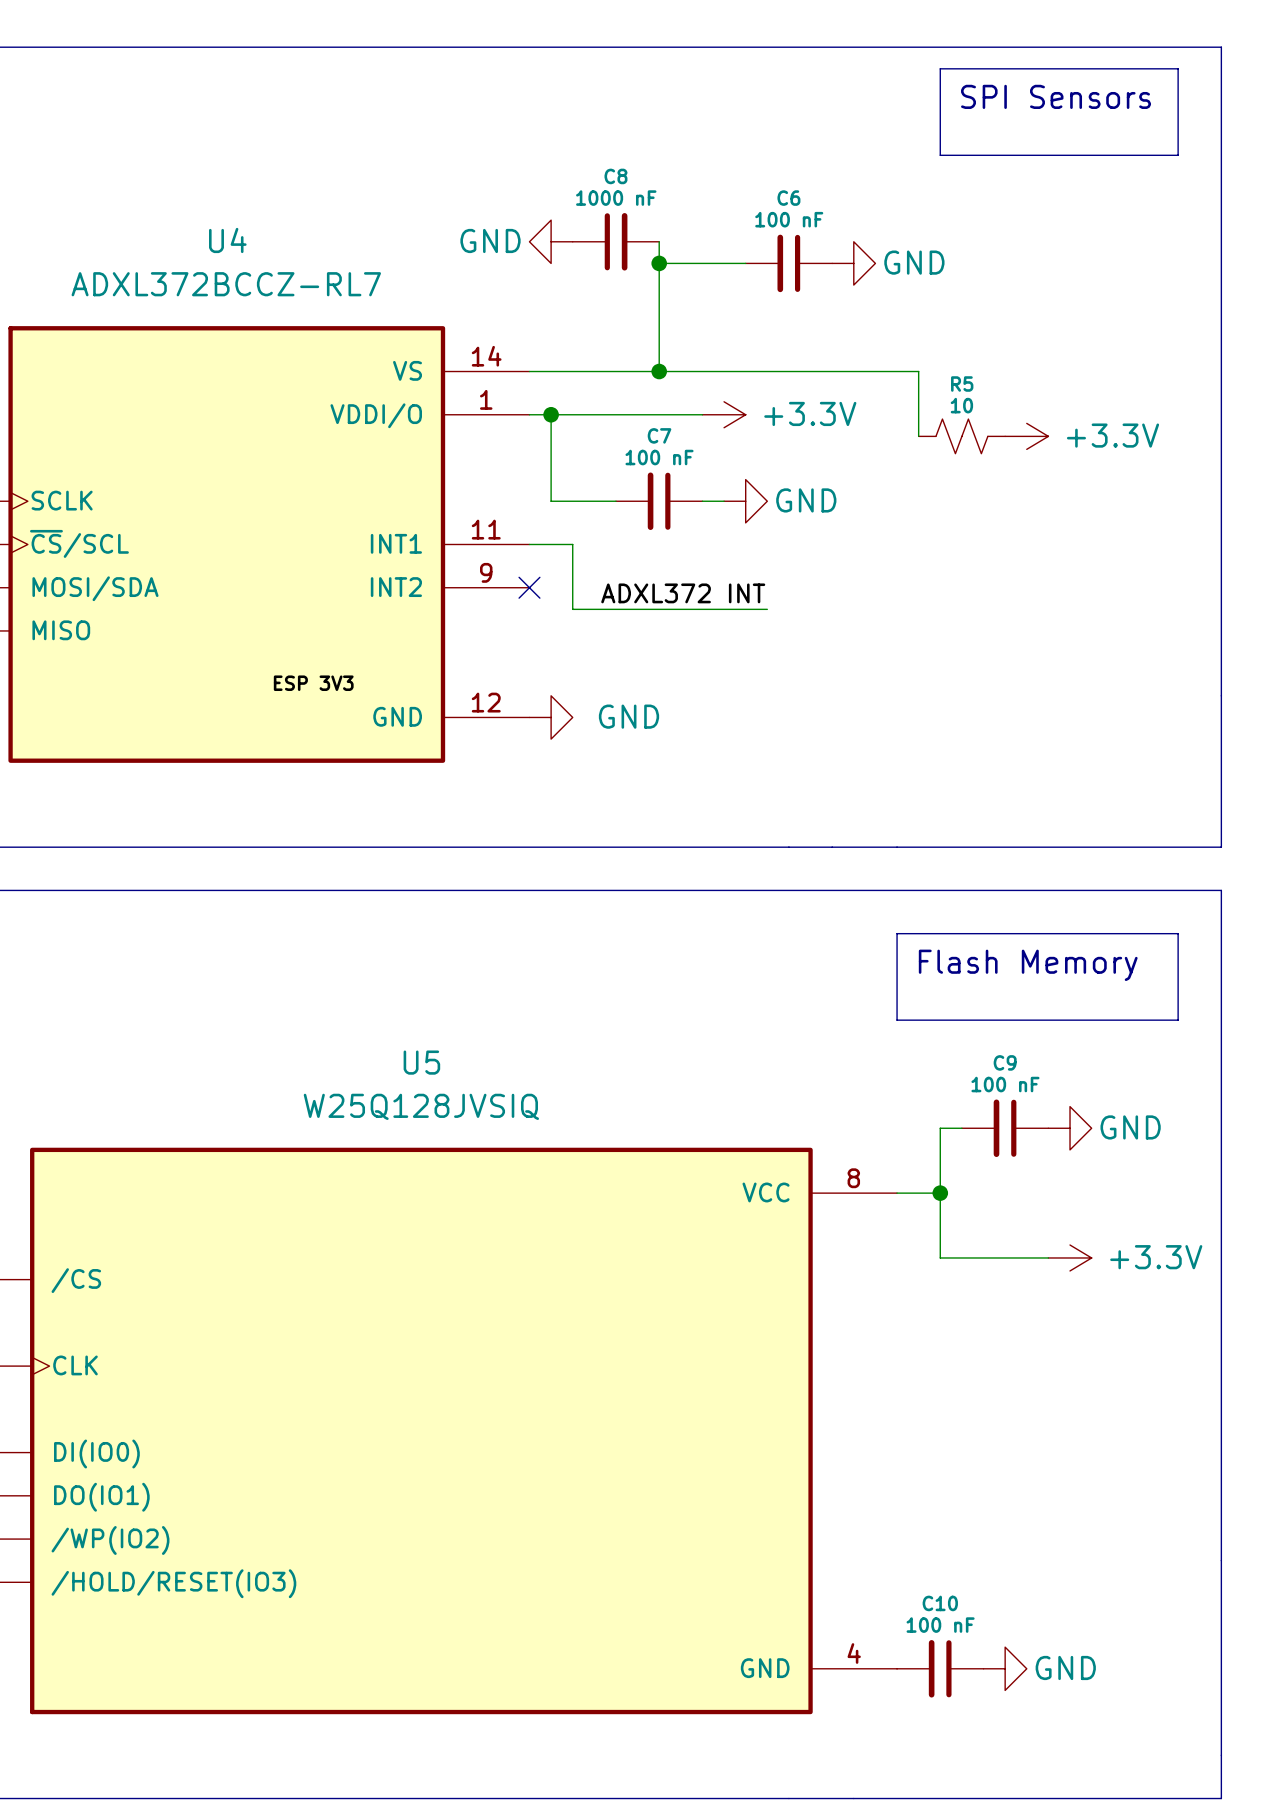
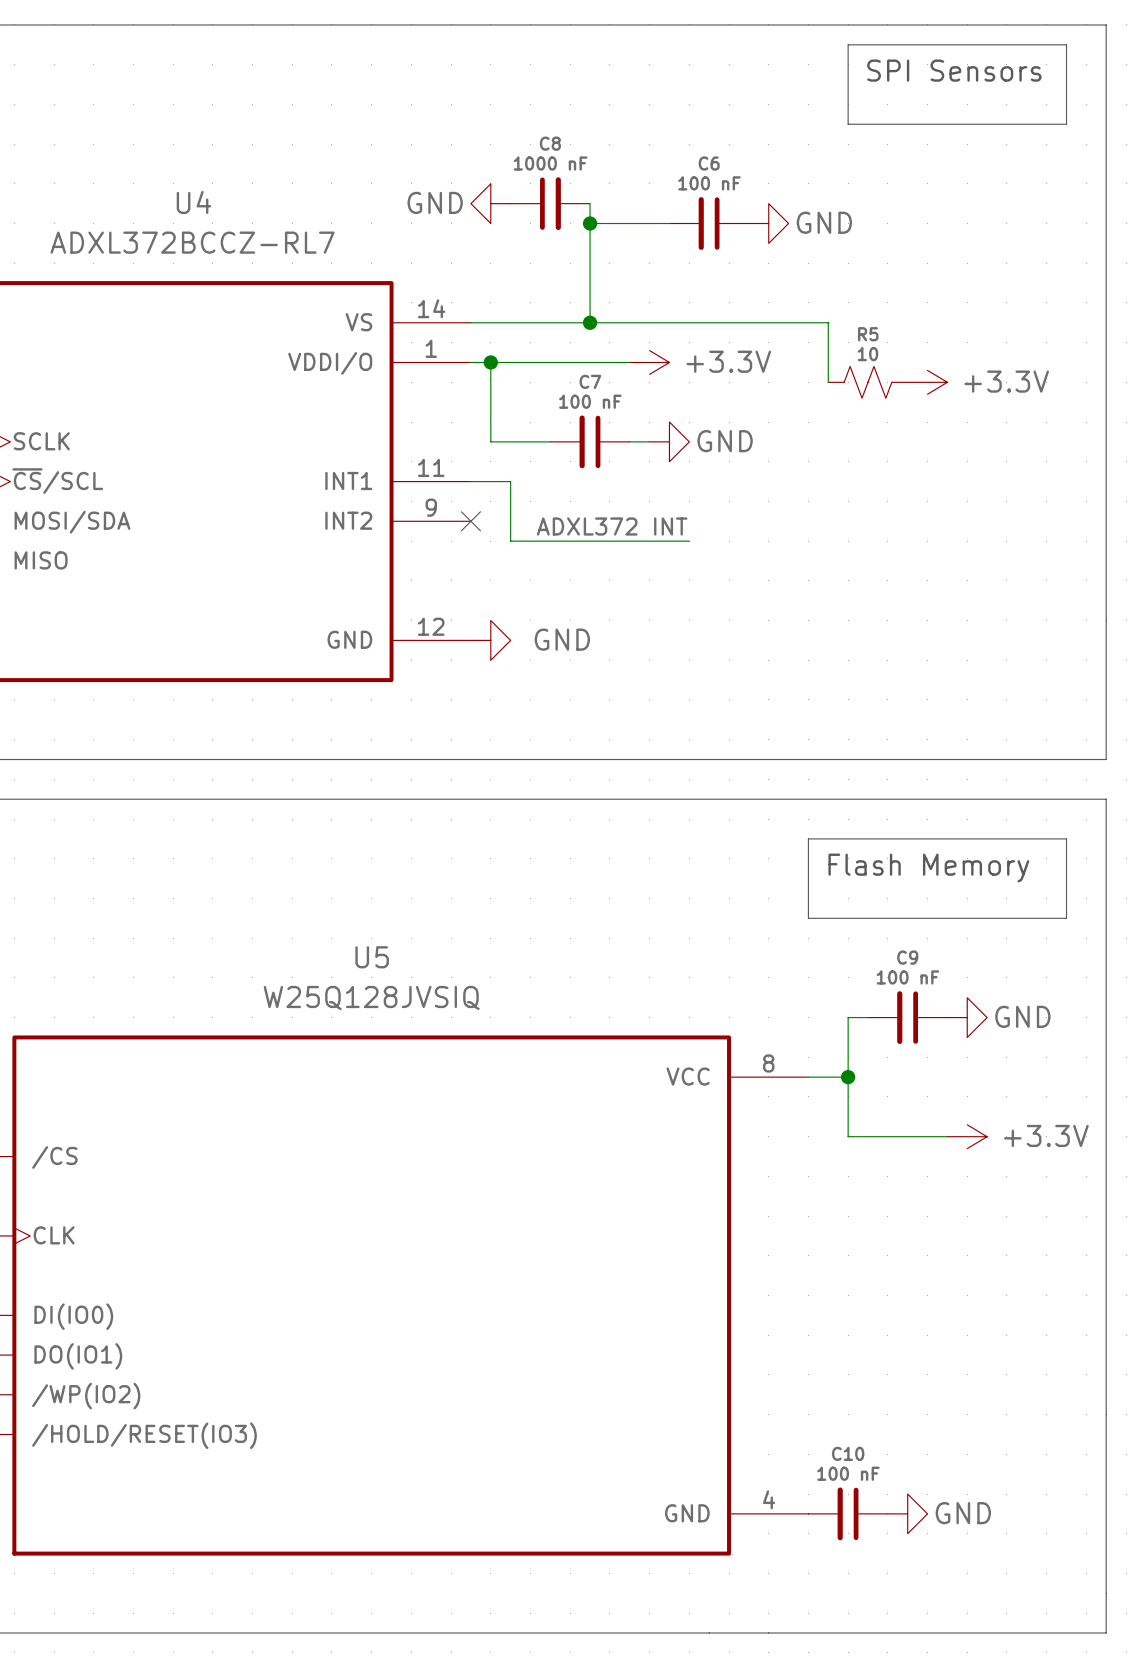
label: ESP 3V3 (313, 683) -> none

